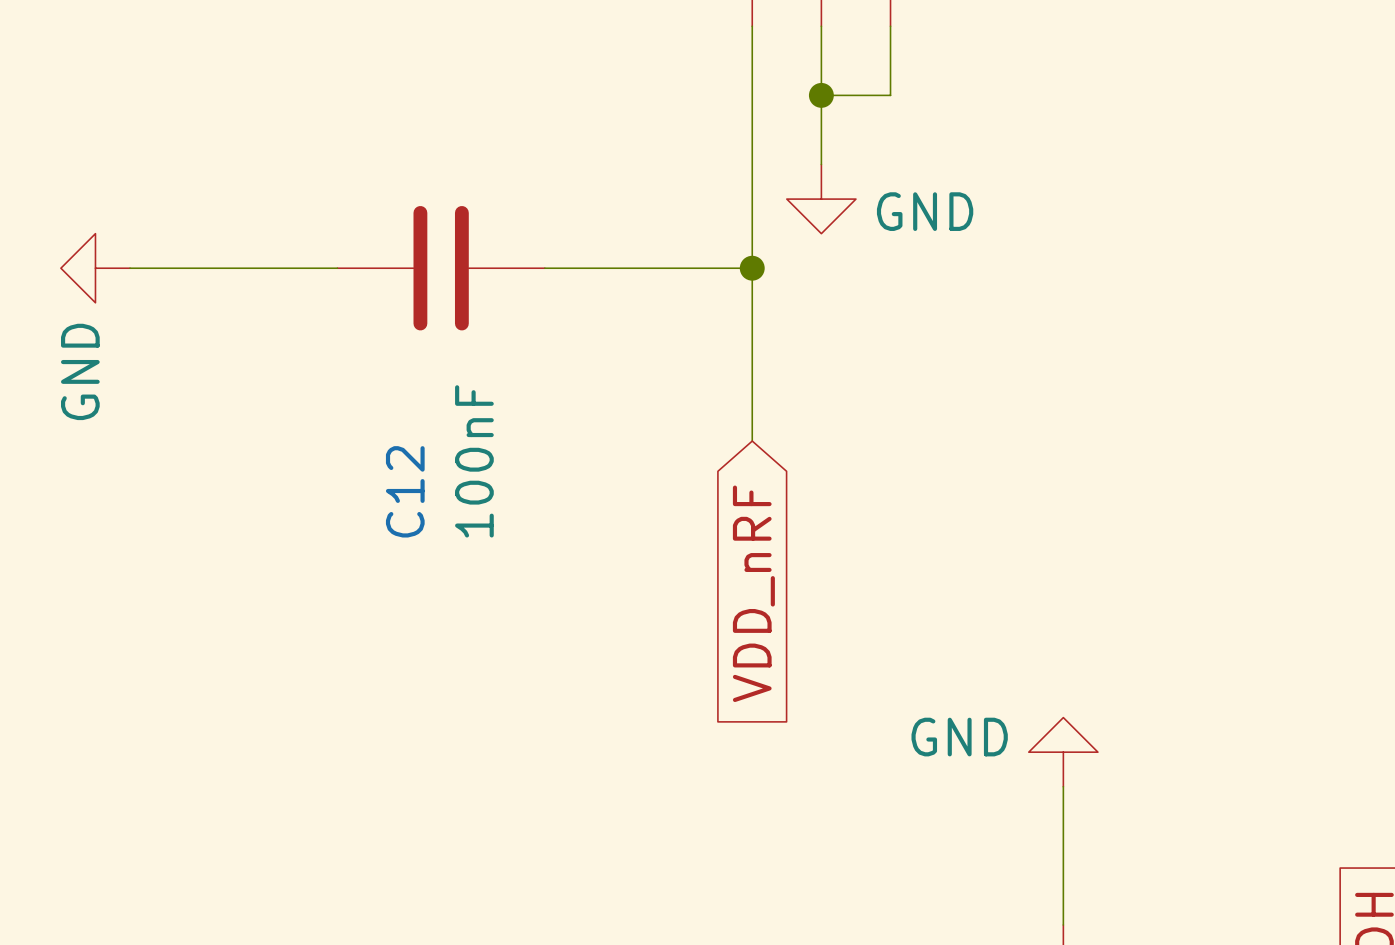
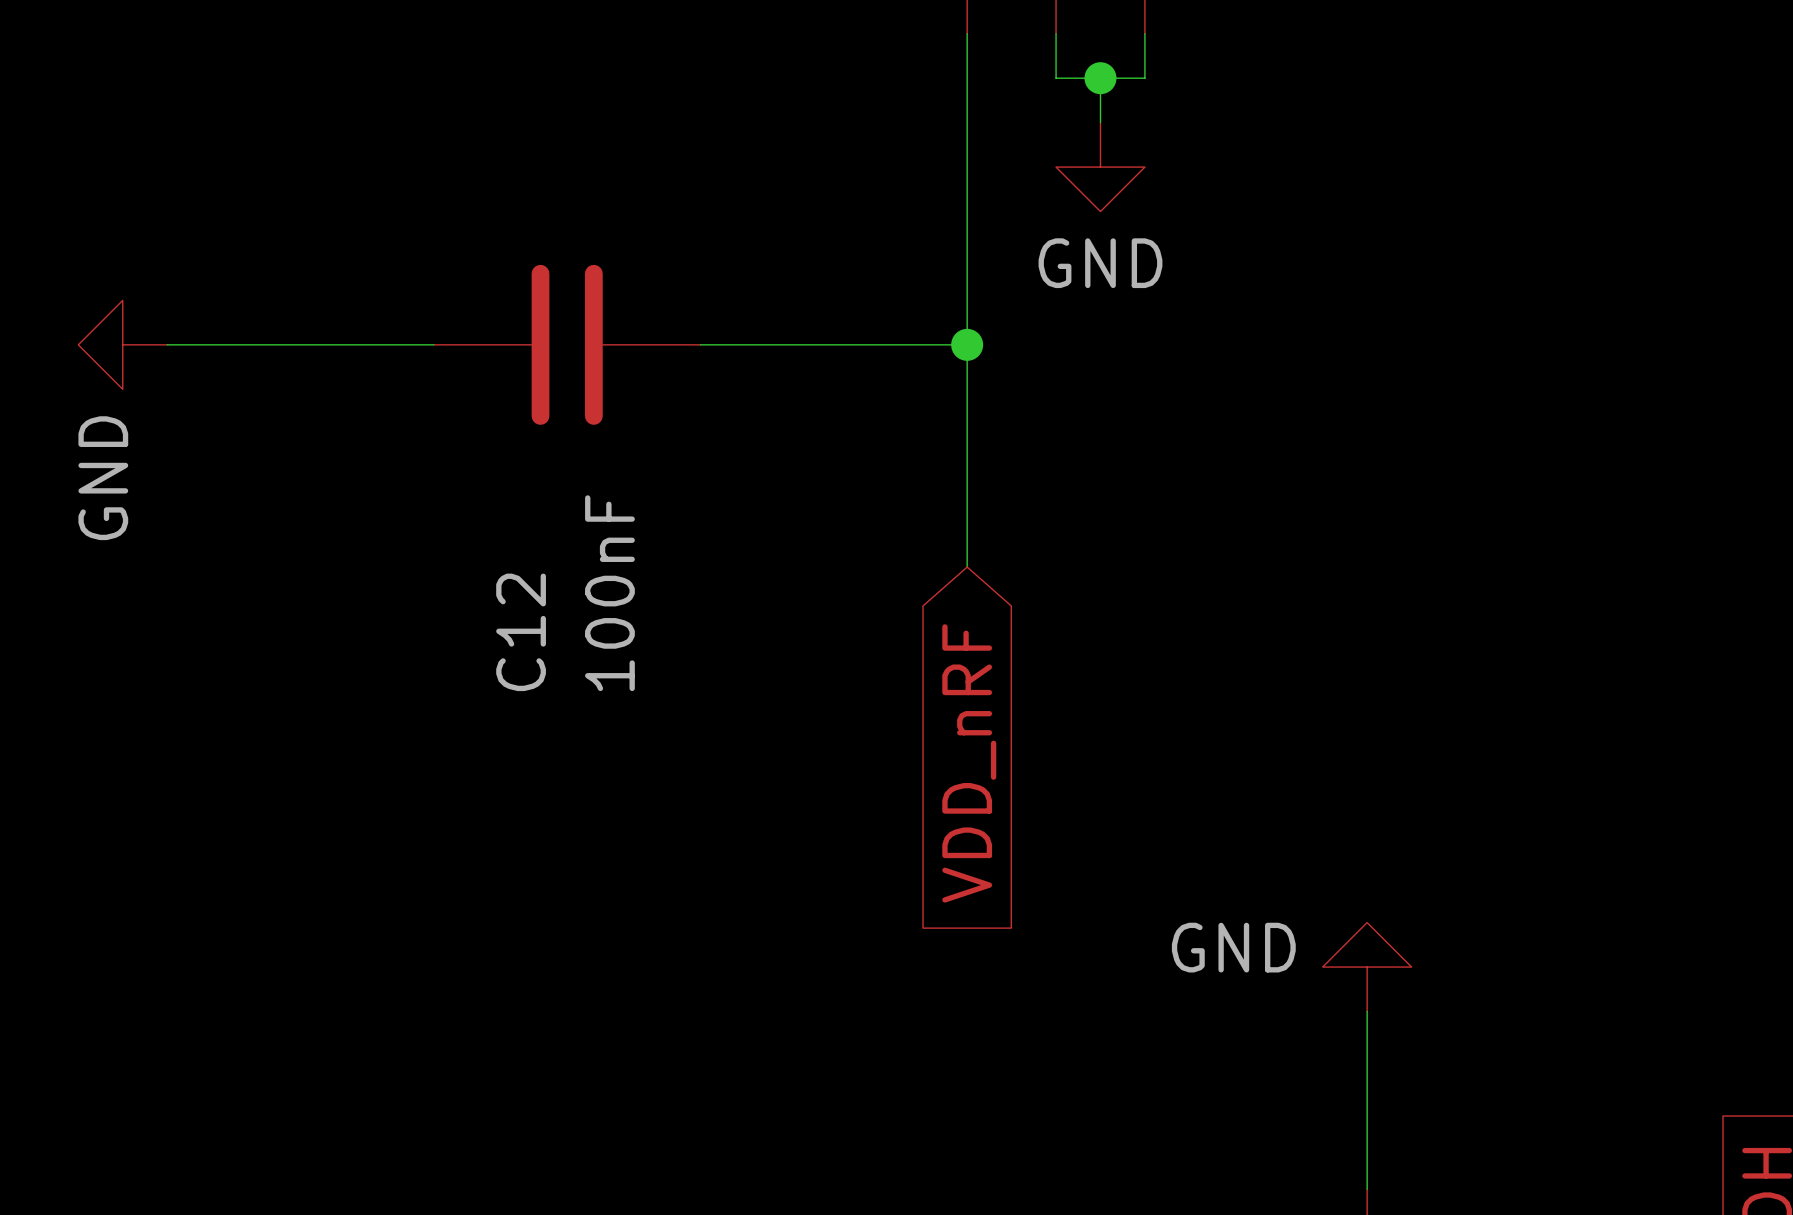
wire: (821, 60) (821, 164) -> none
wire: none -> (1100, 78) (1100, 122)
wire: (890, 60) (890, 95) (821, 95) -> (1144, 78) (1056, 78)
junction position: (821, 95) -> (1100, 78)
power symbol position: GND (821, 199) -> GND (1100, 167)
power symbol text position: GND (925, 211) -> GND (1100, 263)

